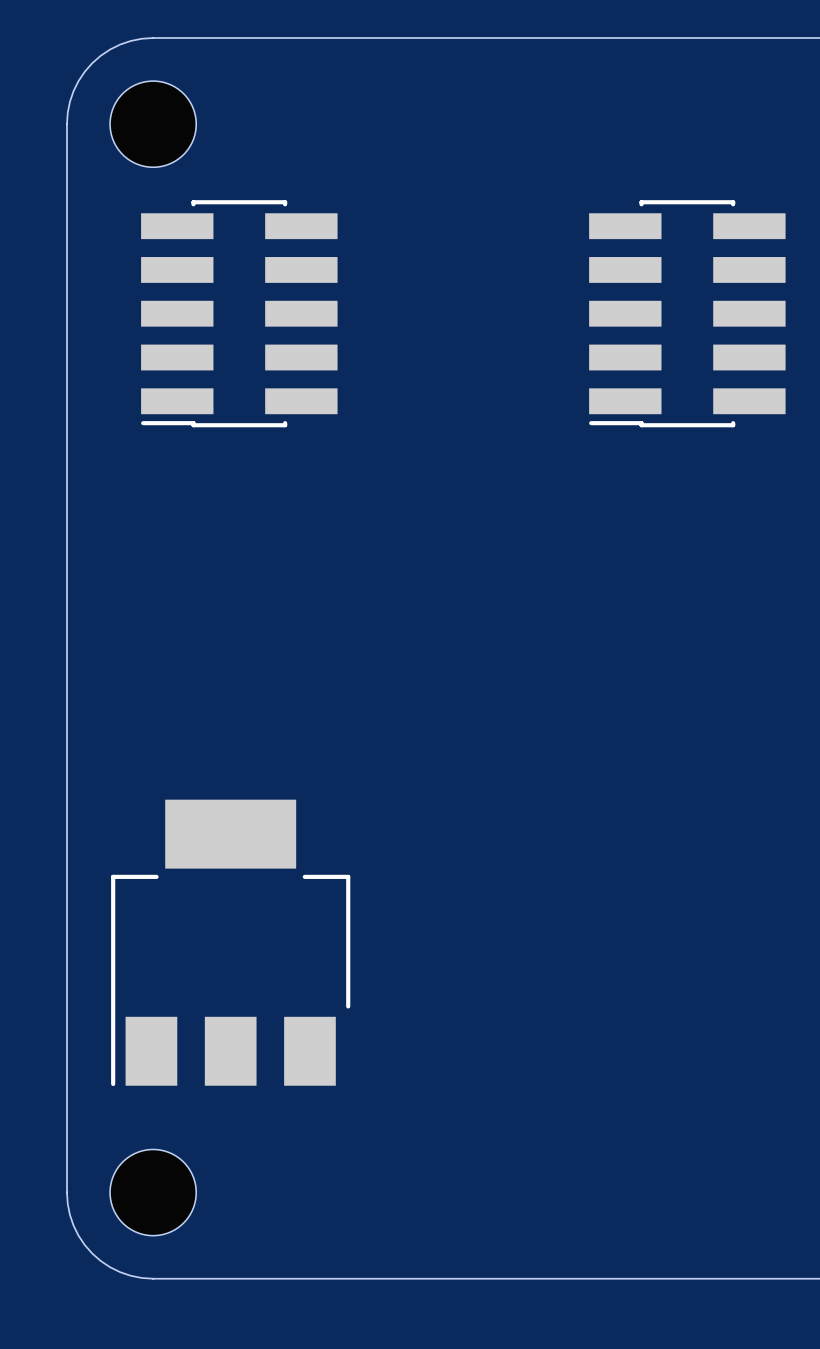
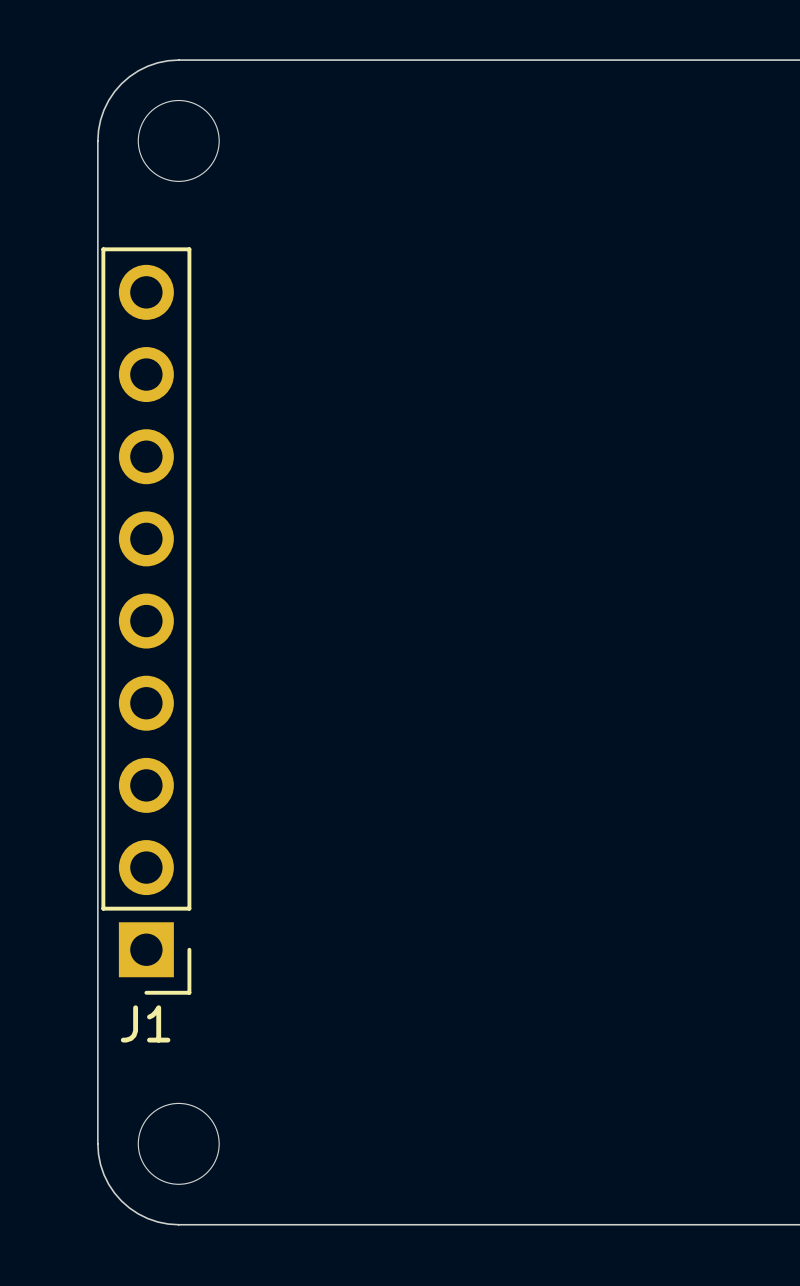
part: (239, 313) -> none
part: (687, 313) -> none
J1: none -> (146, 621)
part: (230, 942) -> none

